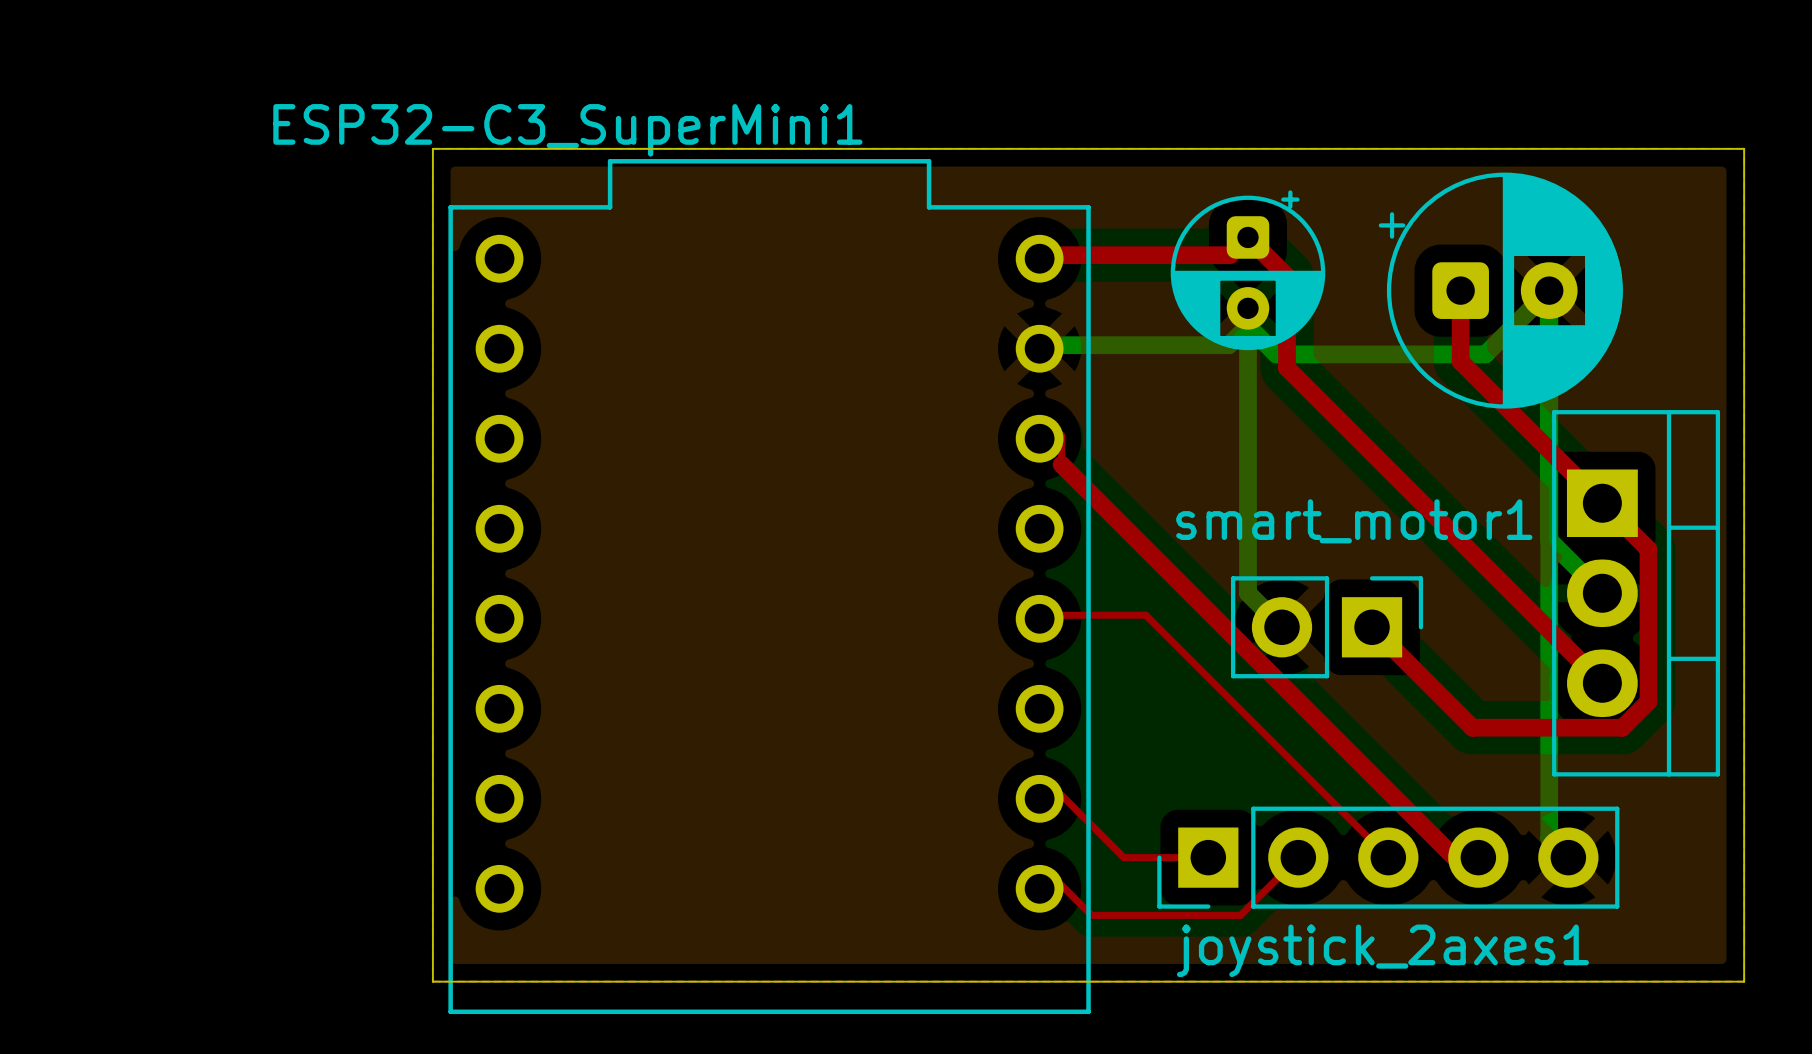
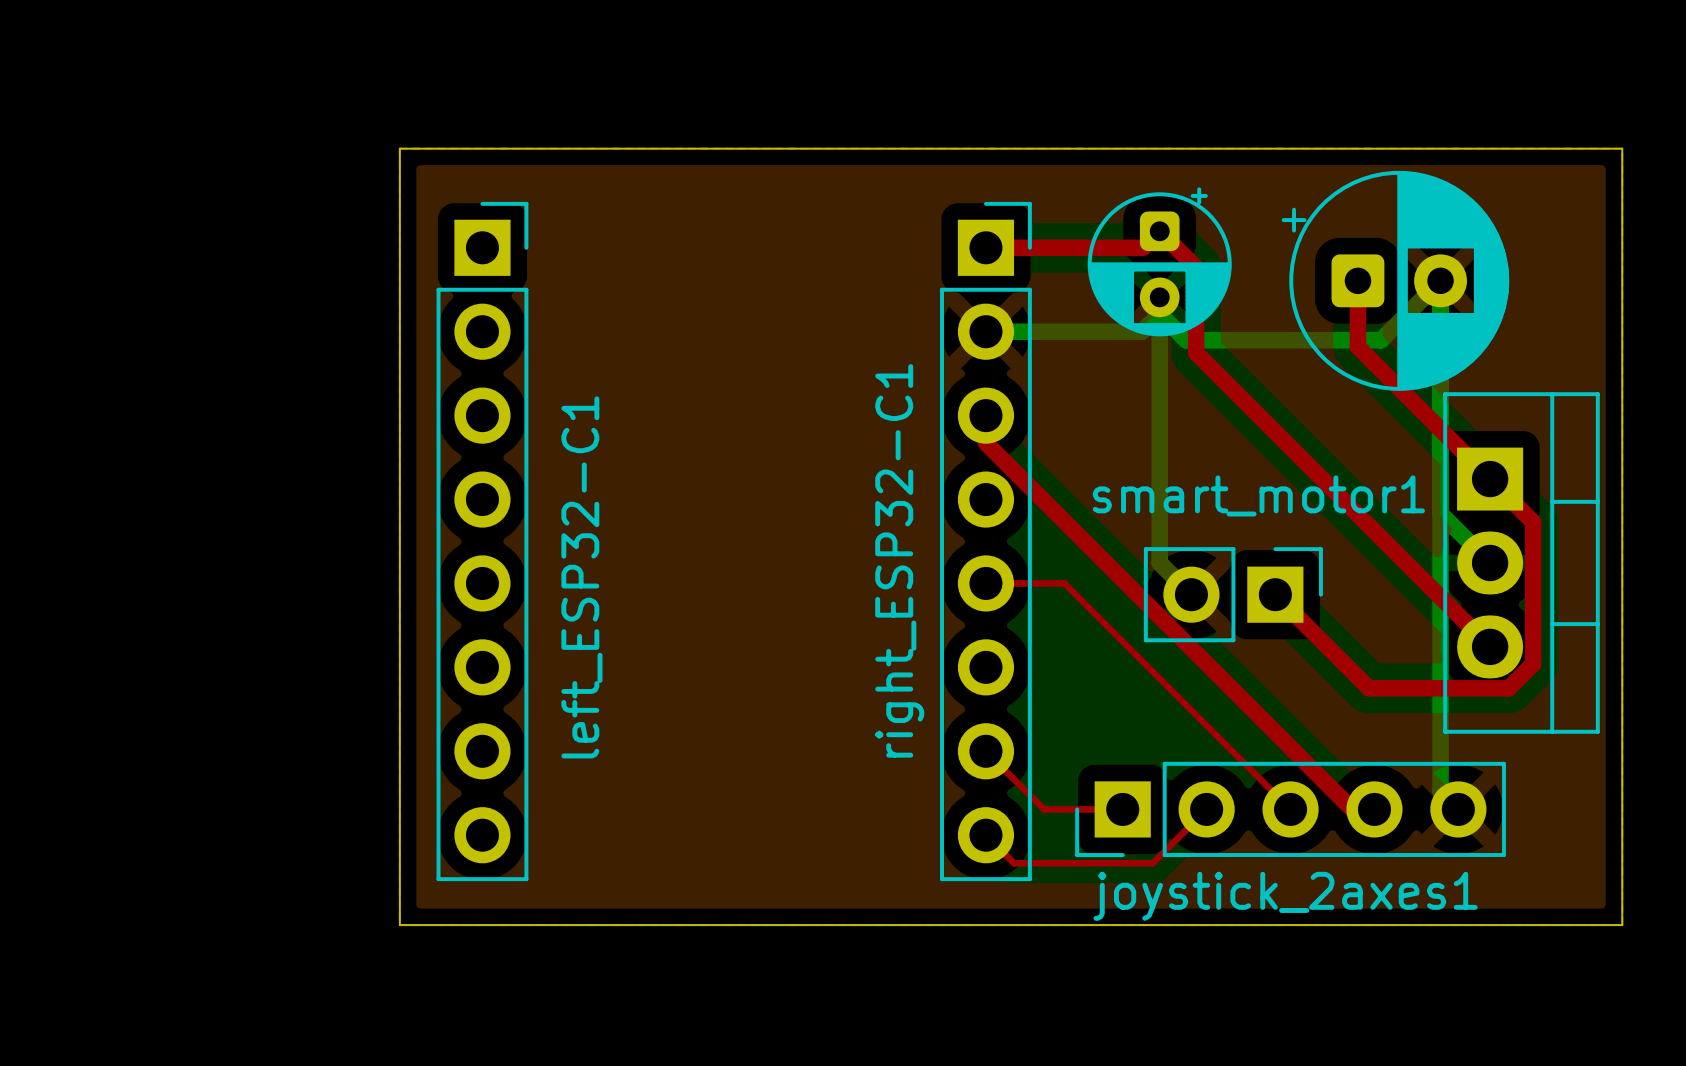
left_ESP32-C1: none -> (482, 541)
right_ESP32-C1: none -> (985, 541)
ESP32-C3_SuperMini1: (769, 586) -> none

